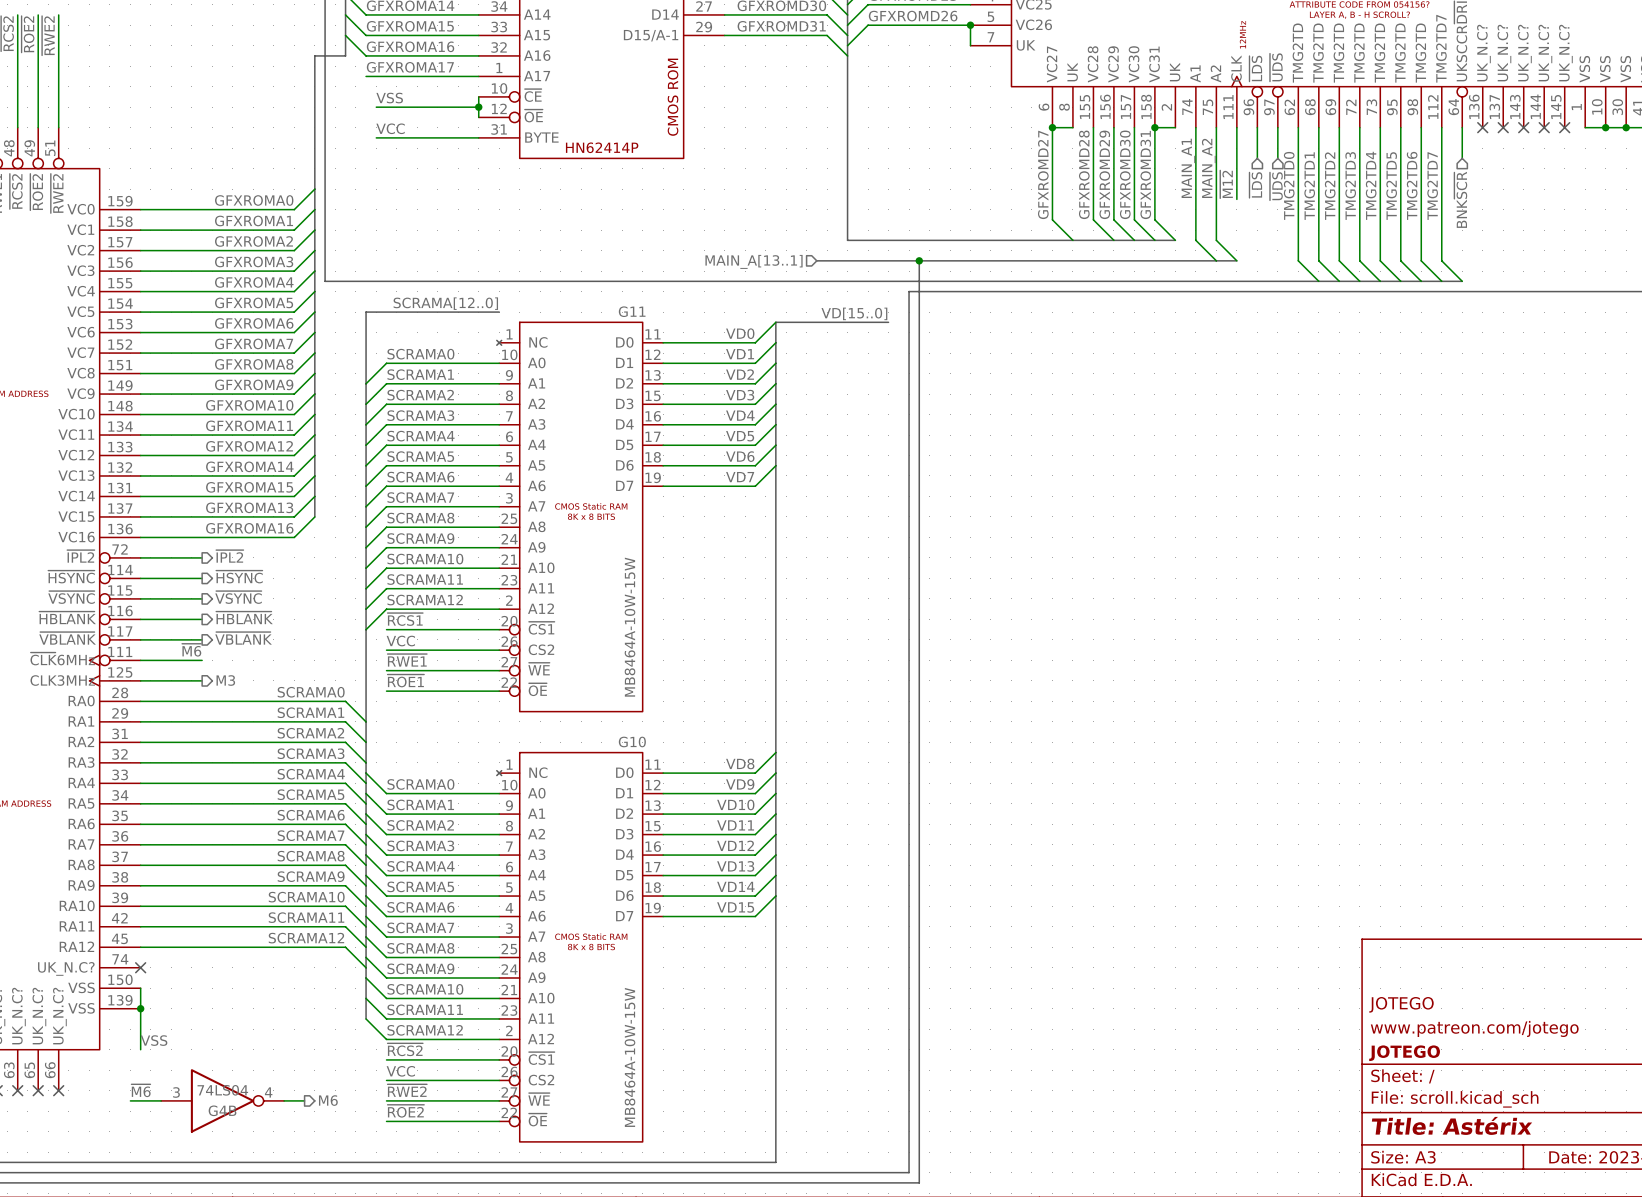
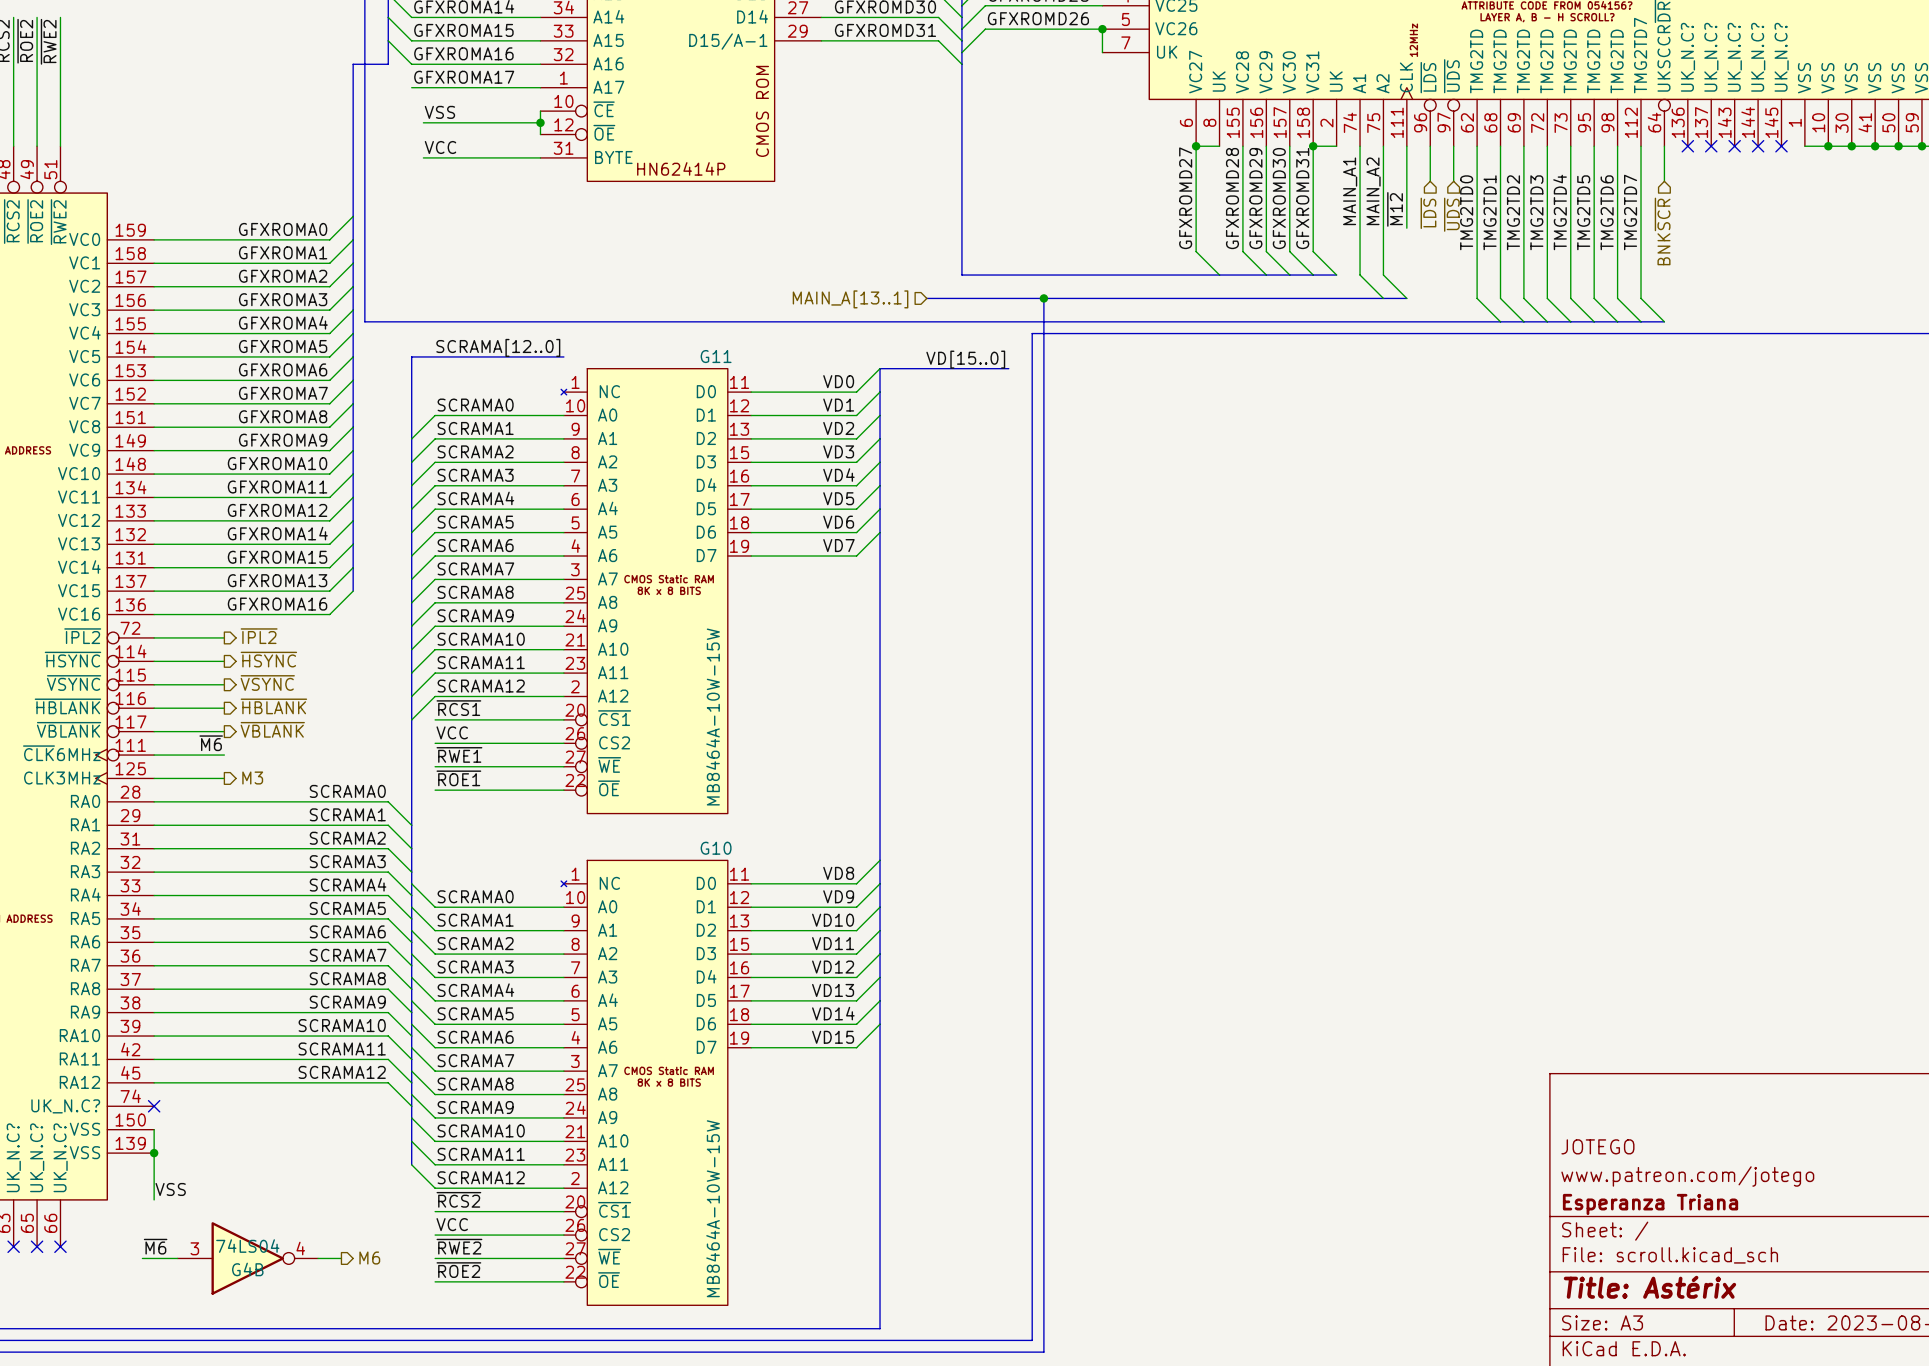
title block: JOTEGO (1404, 1053) -> Esperanza Triana (1650, 1204)

